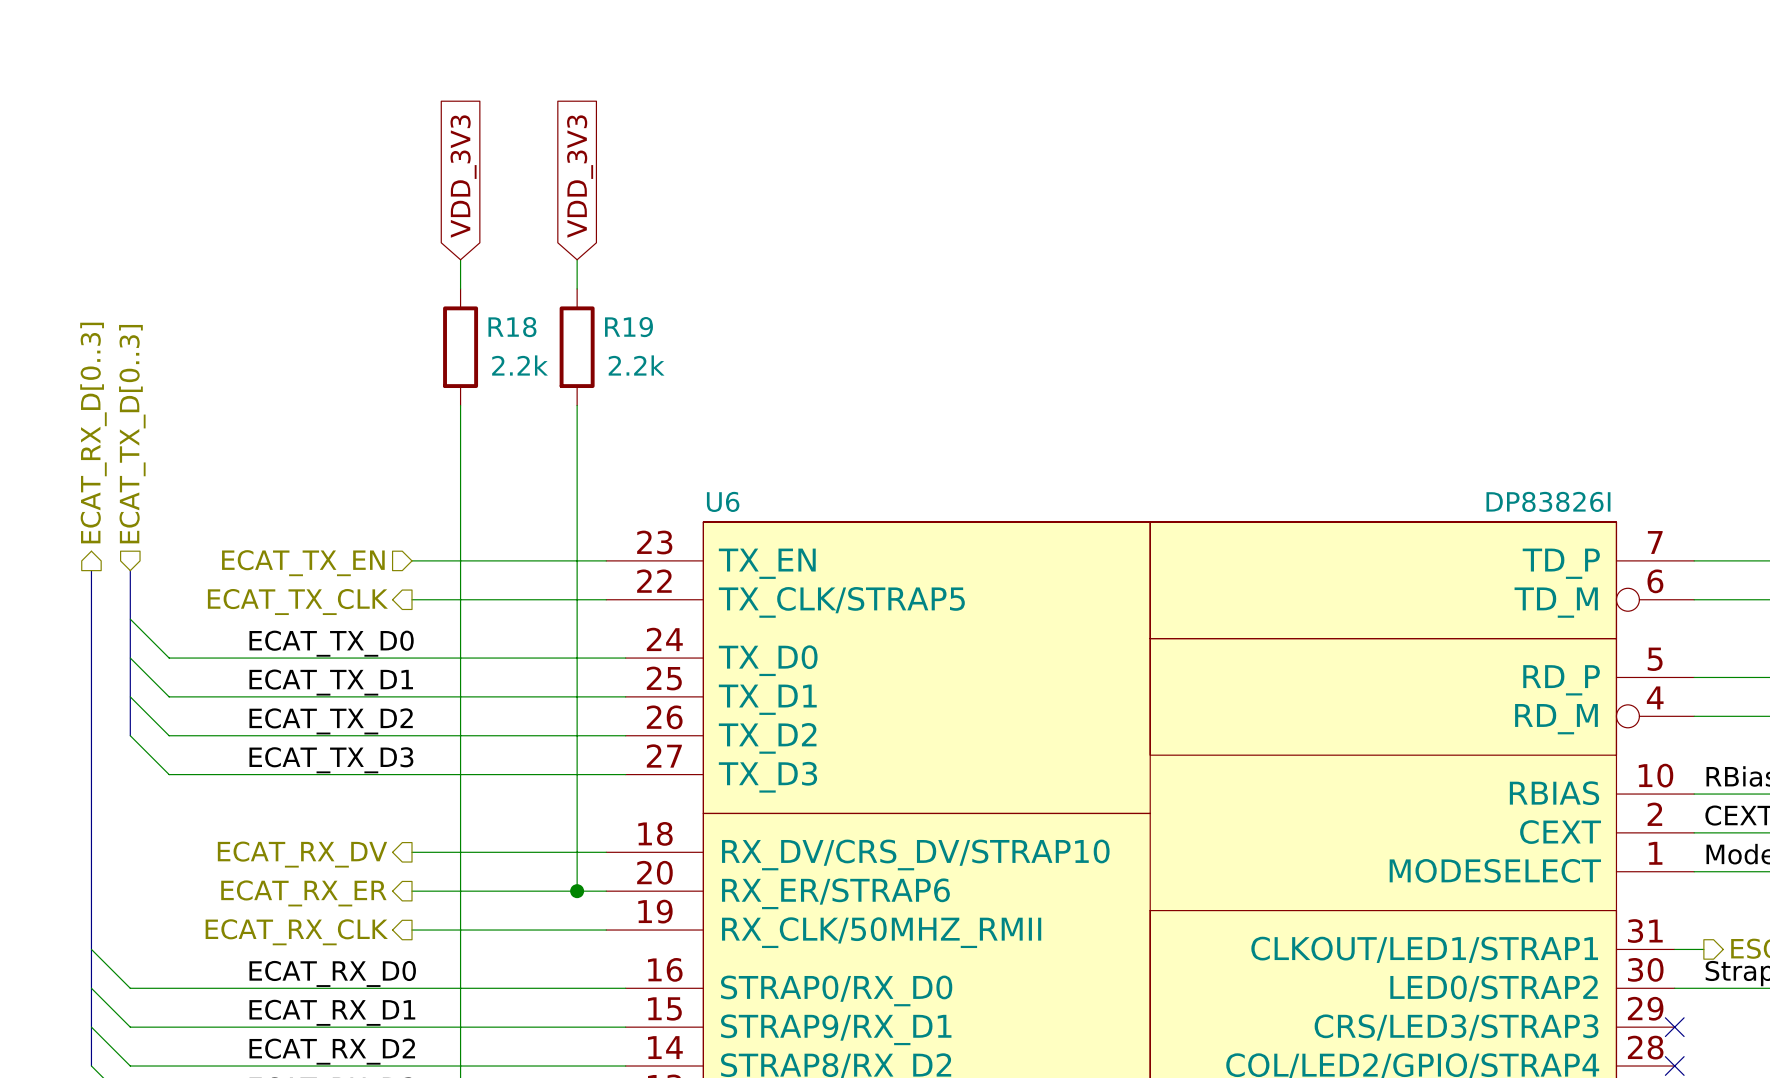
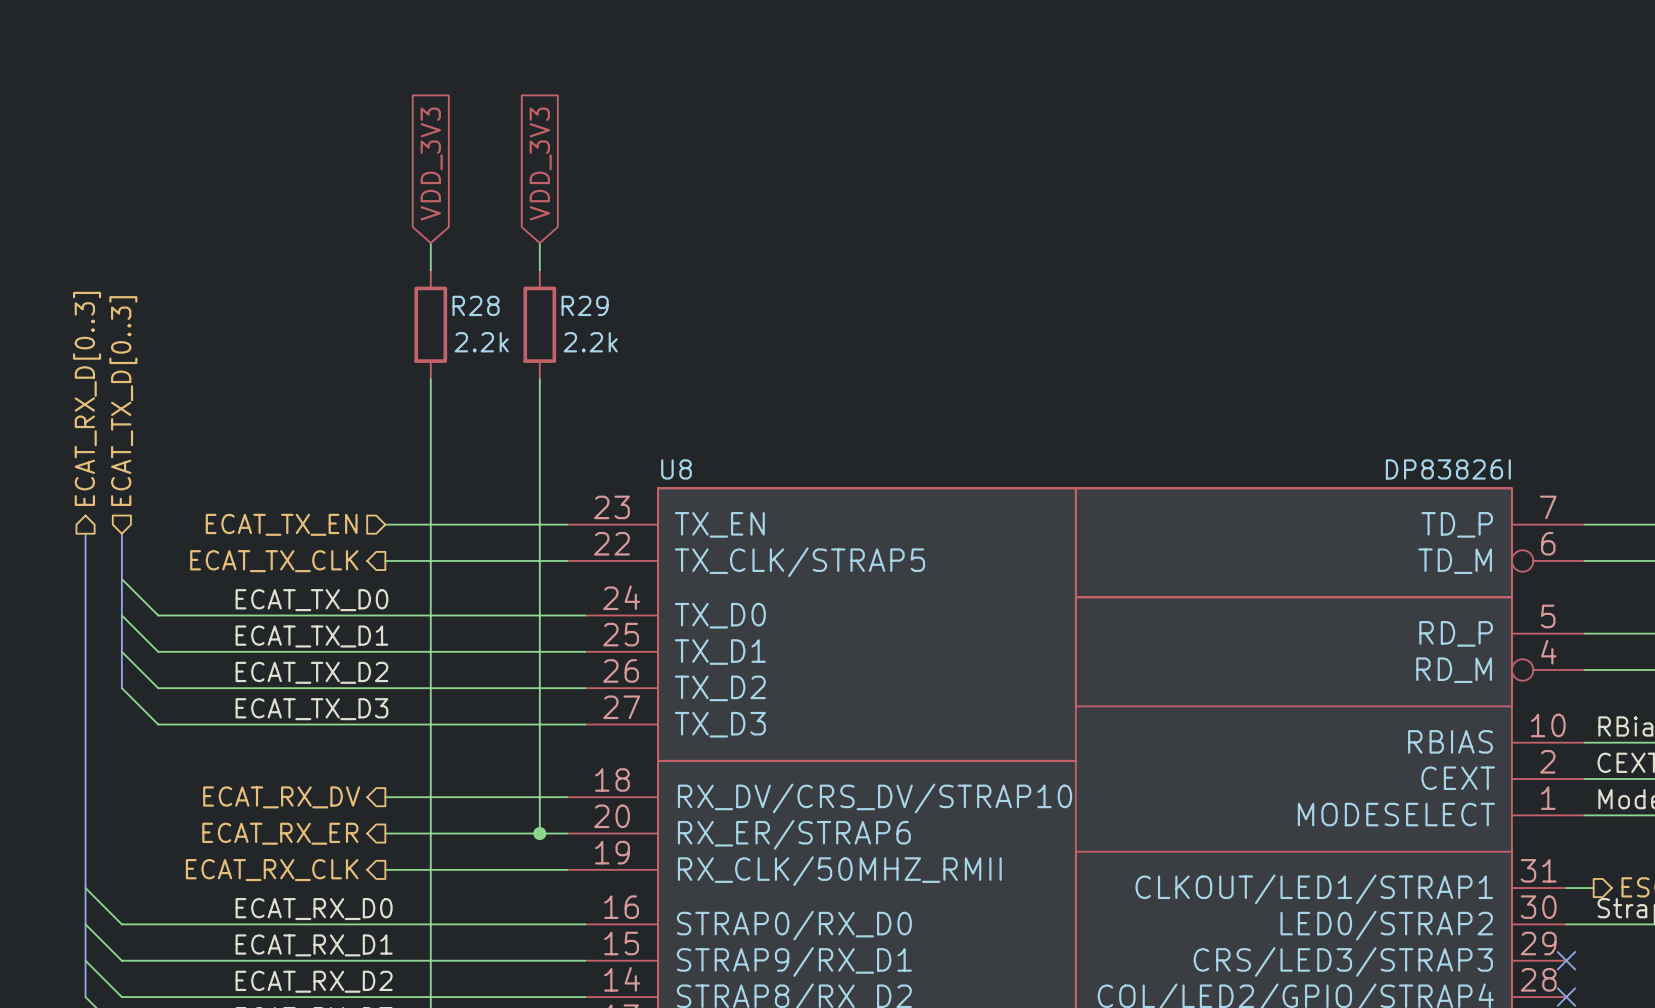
R18 name: R18 (512, 327) -> R28 (476, 305)
R19 name: R19 (628, 327) -> R29 (585, 305)
U6 name: U6 (723, 501) -> U8 (676, 469)

